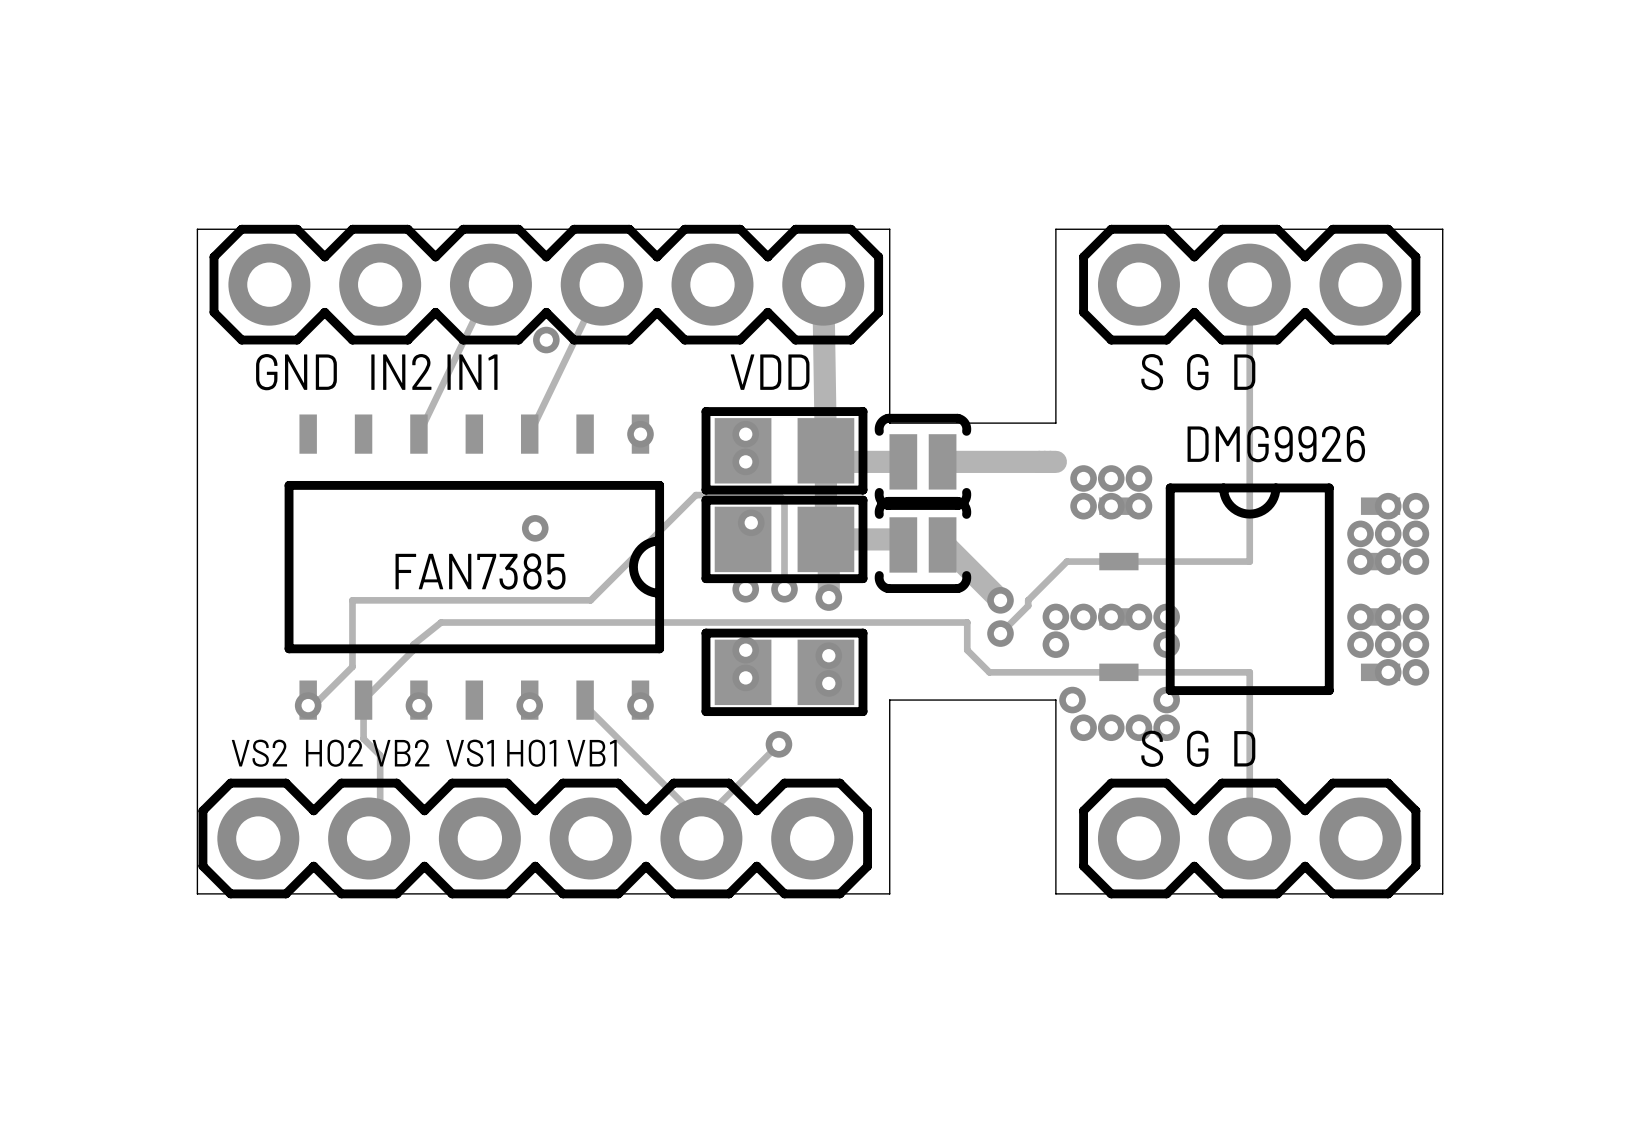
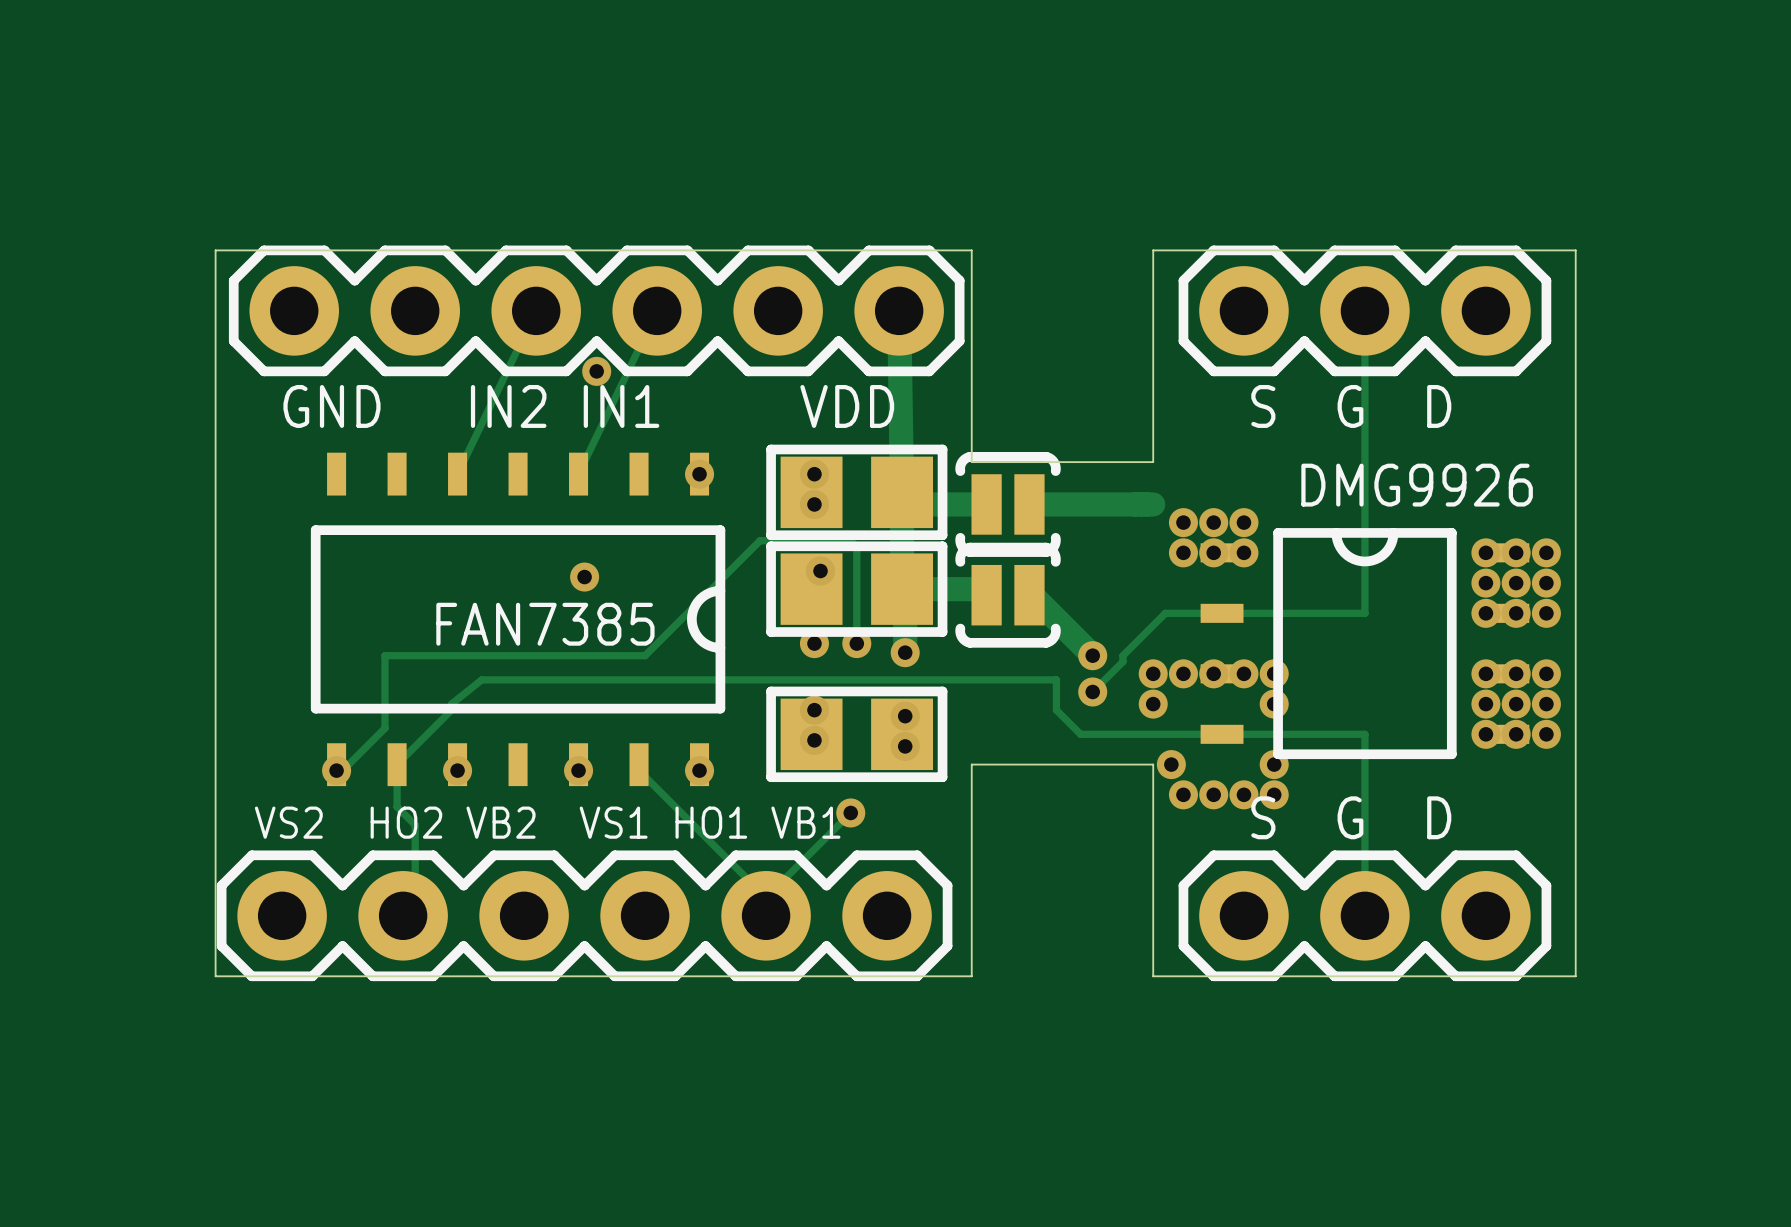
via: none -> (1485, 552)
via: none -> (1485, 734)

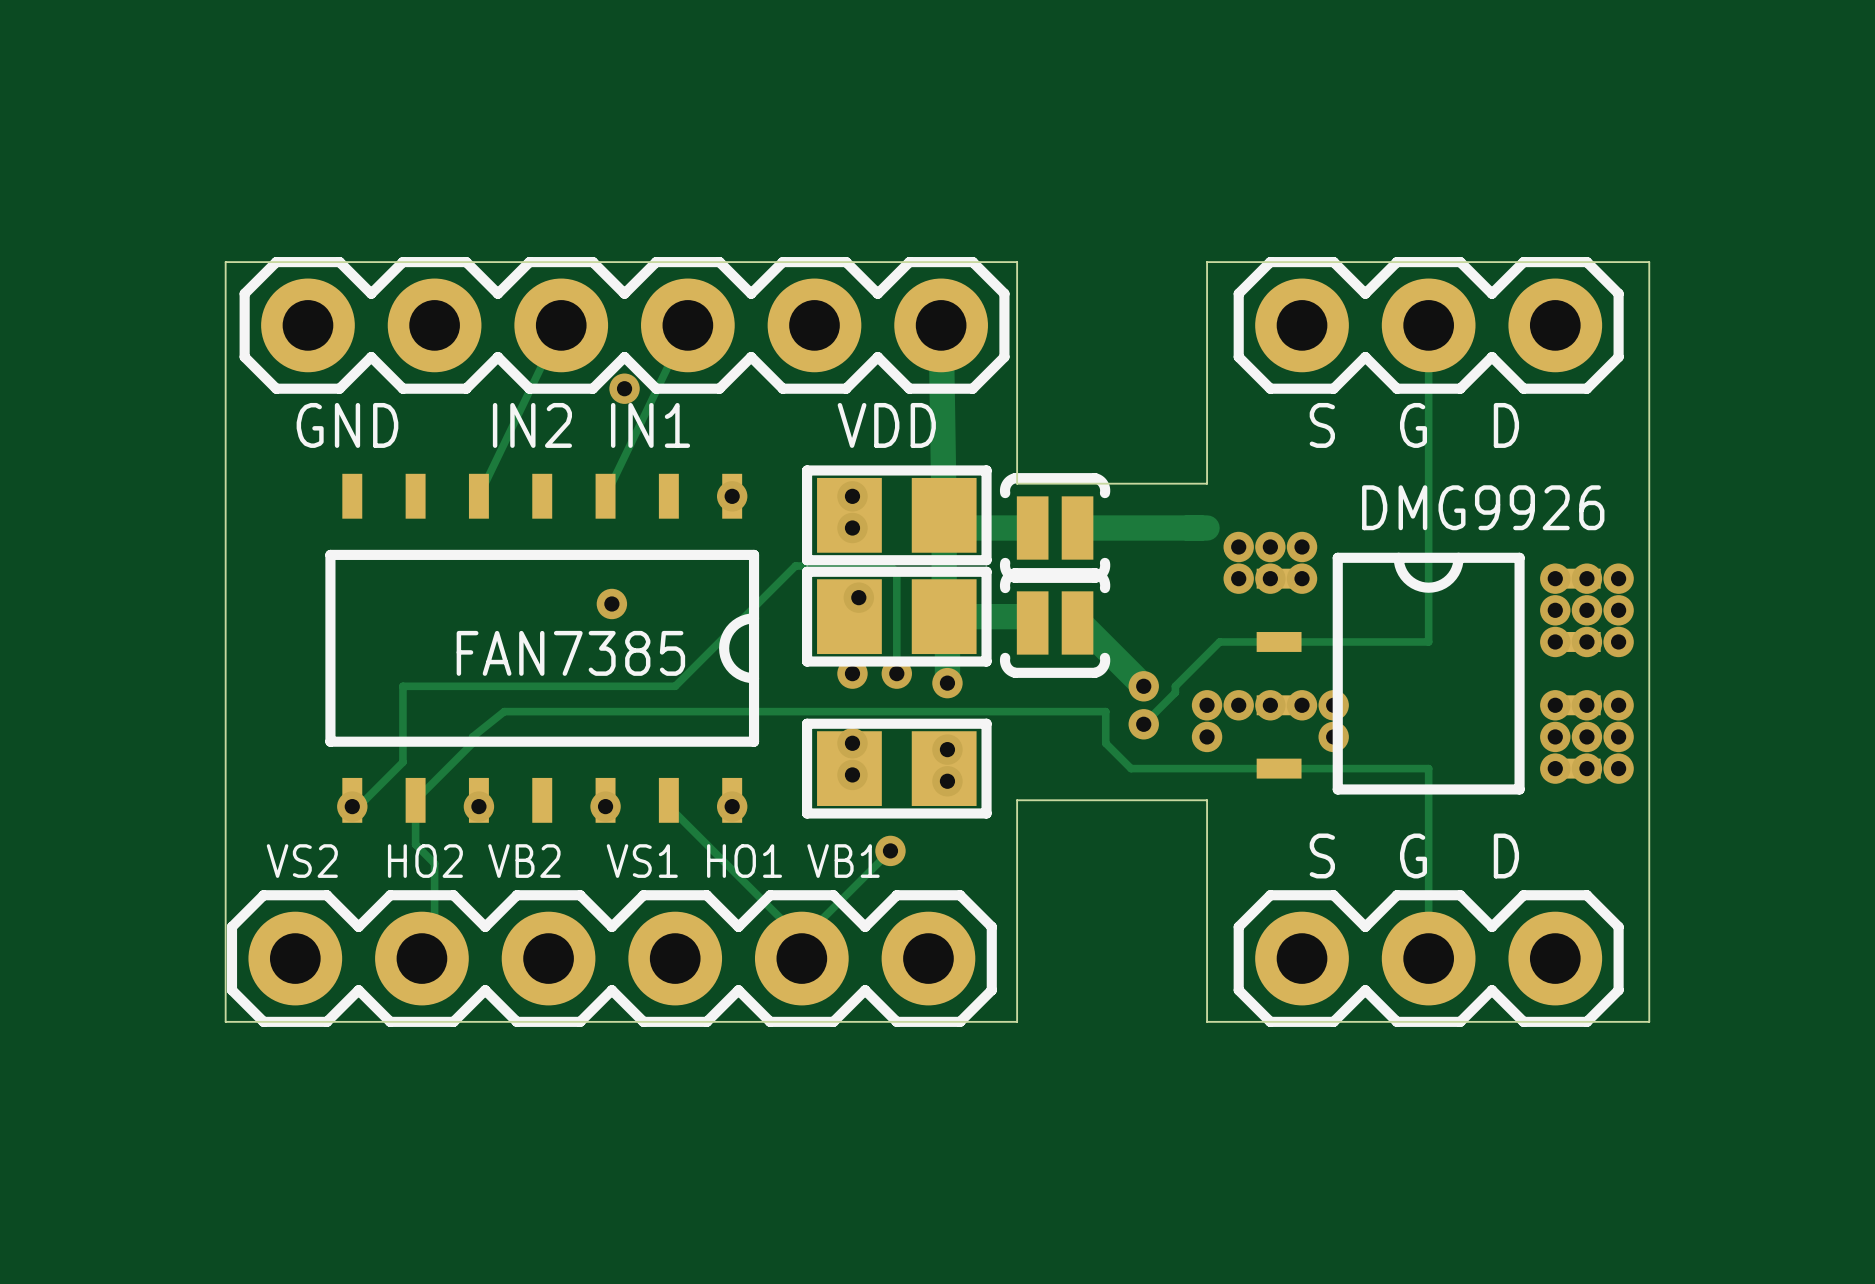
via: (1171, 764) -> none
via: (1274, 764) -> none
via: (1183, 794) -> none
via: (1213, 794) -> none
via: (1243, 794) -> none
via: (1274, 794) -> none

